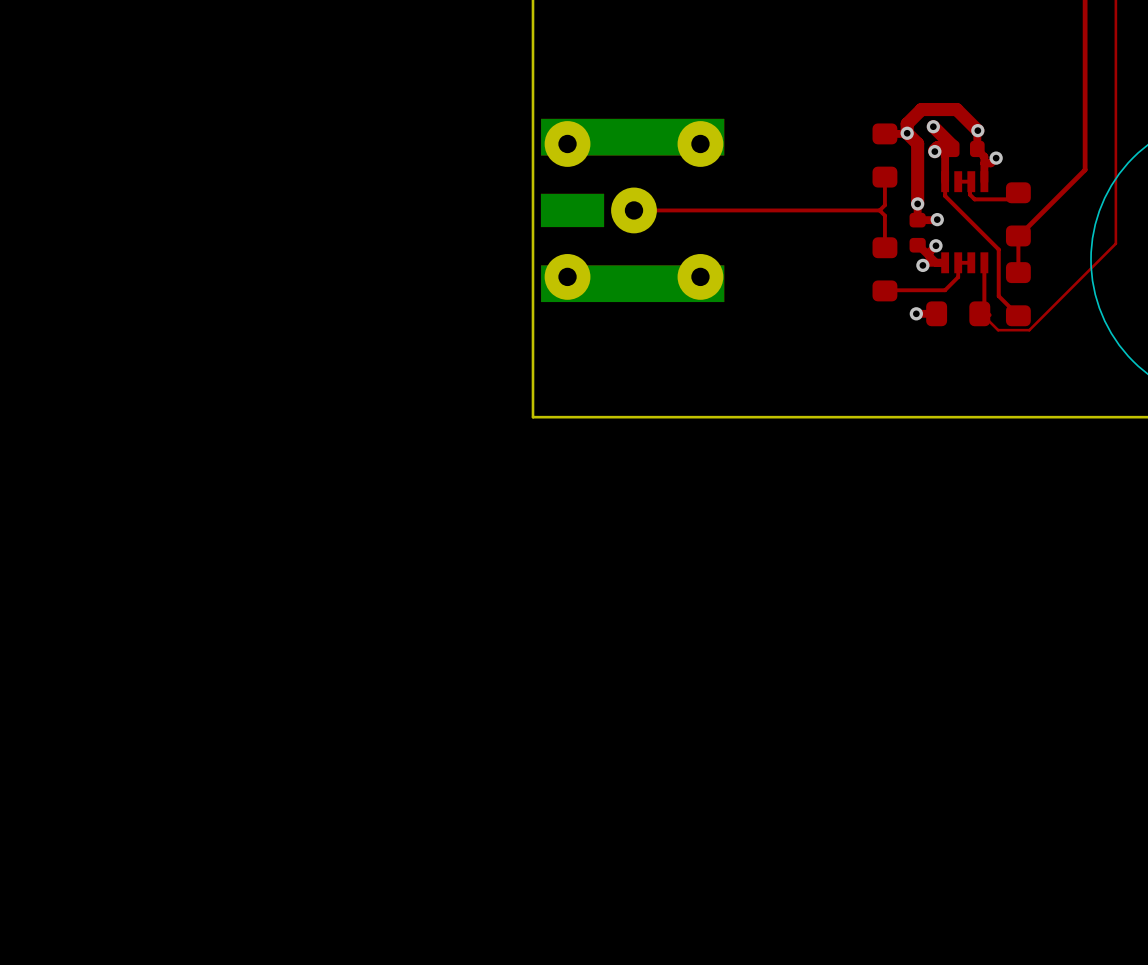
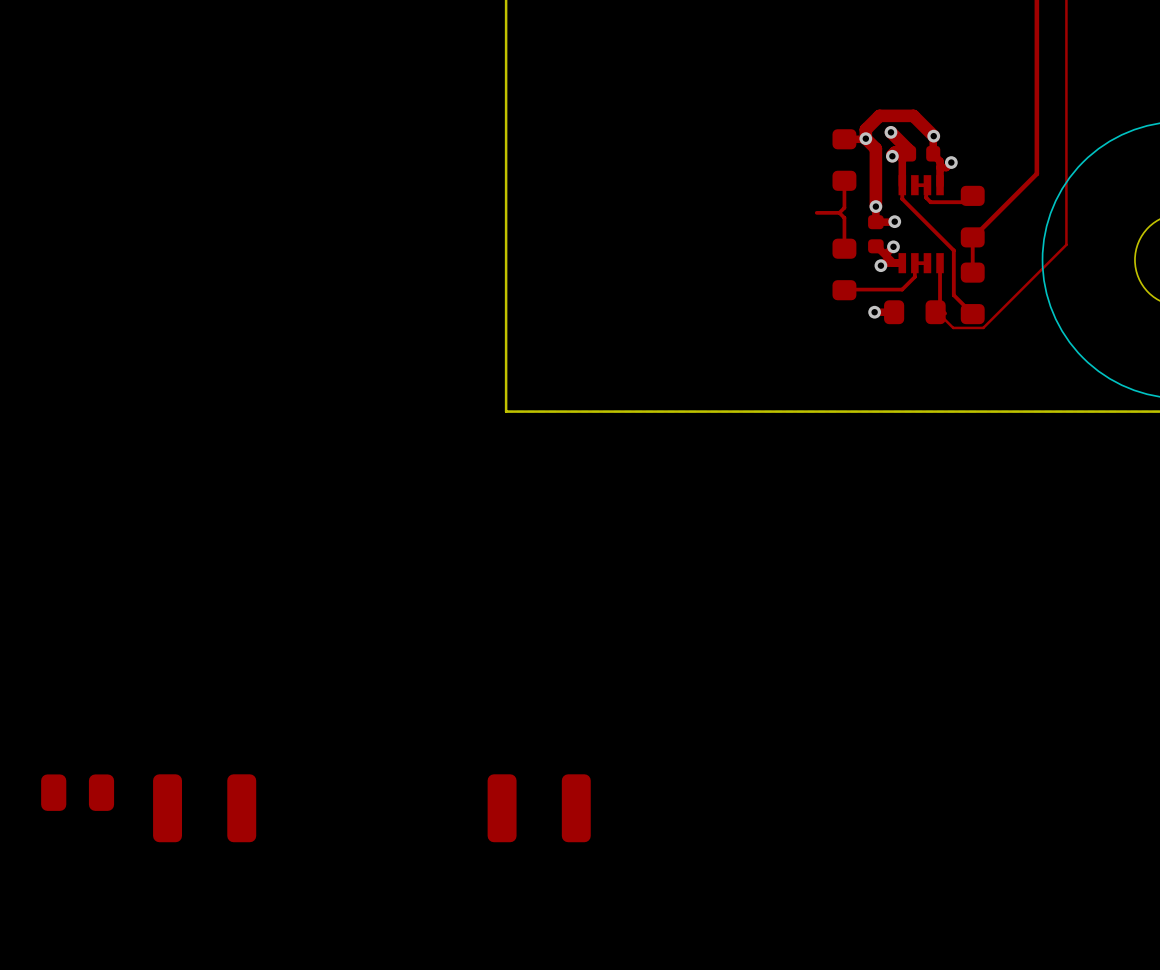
part: (632, 210) -> none
top track: (856, 210) (634, 210) -> none
part: none -> (77, 792)
part: none -> (204, 808)
part: none -> (539, 808)

